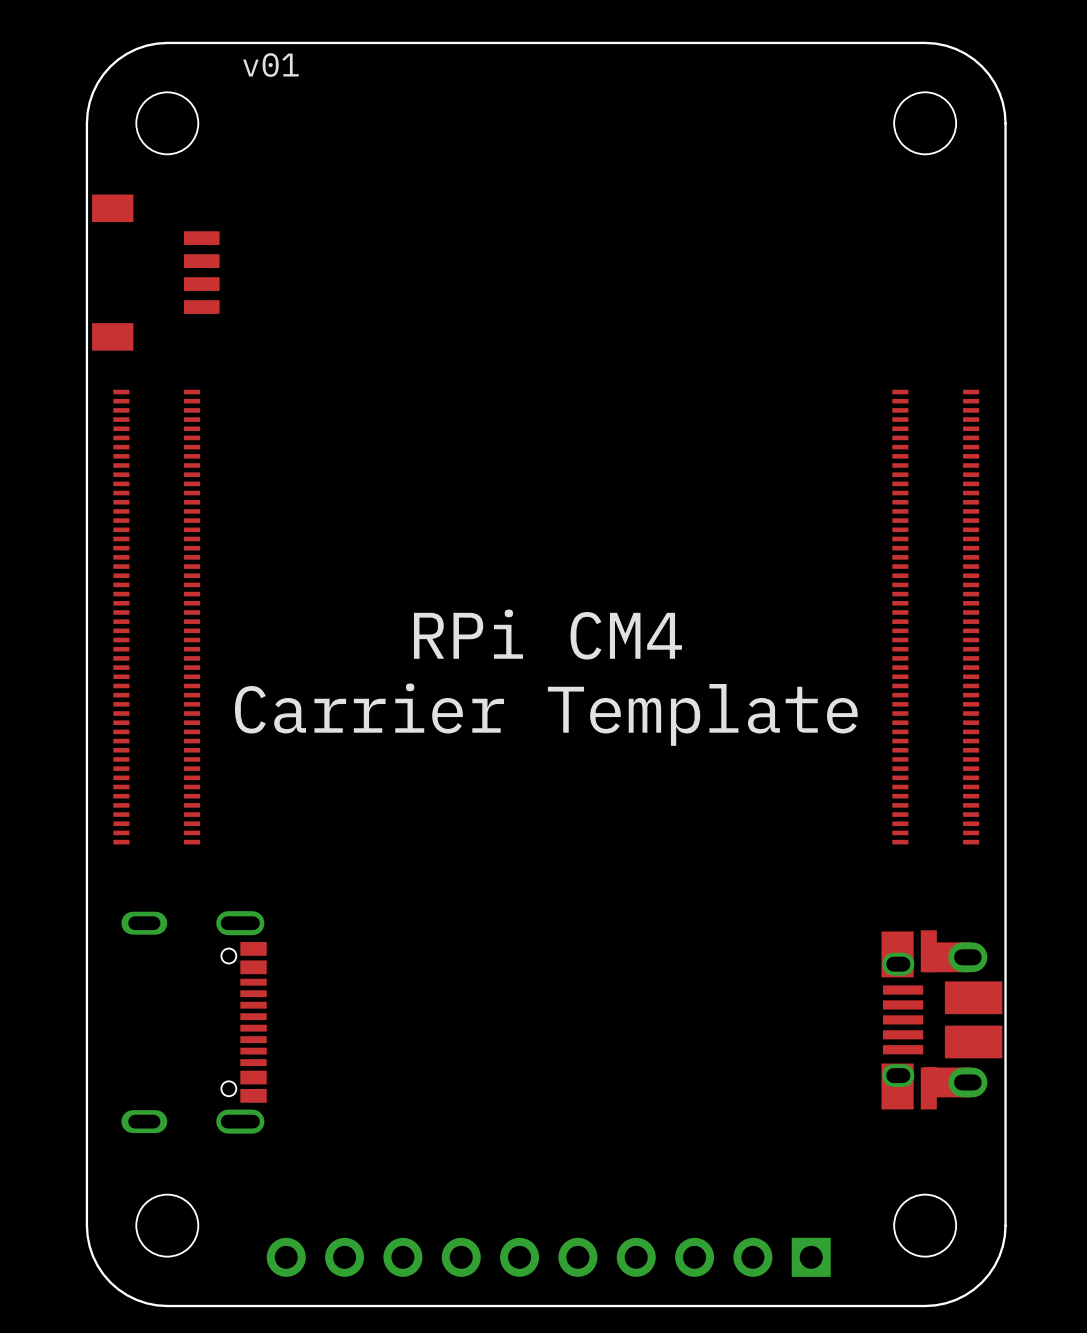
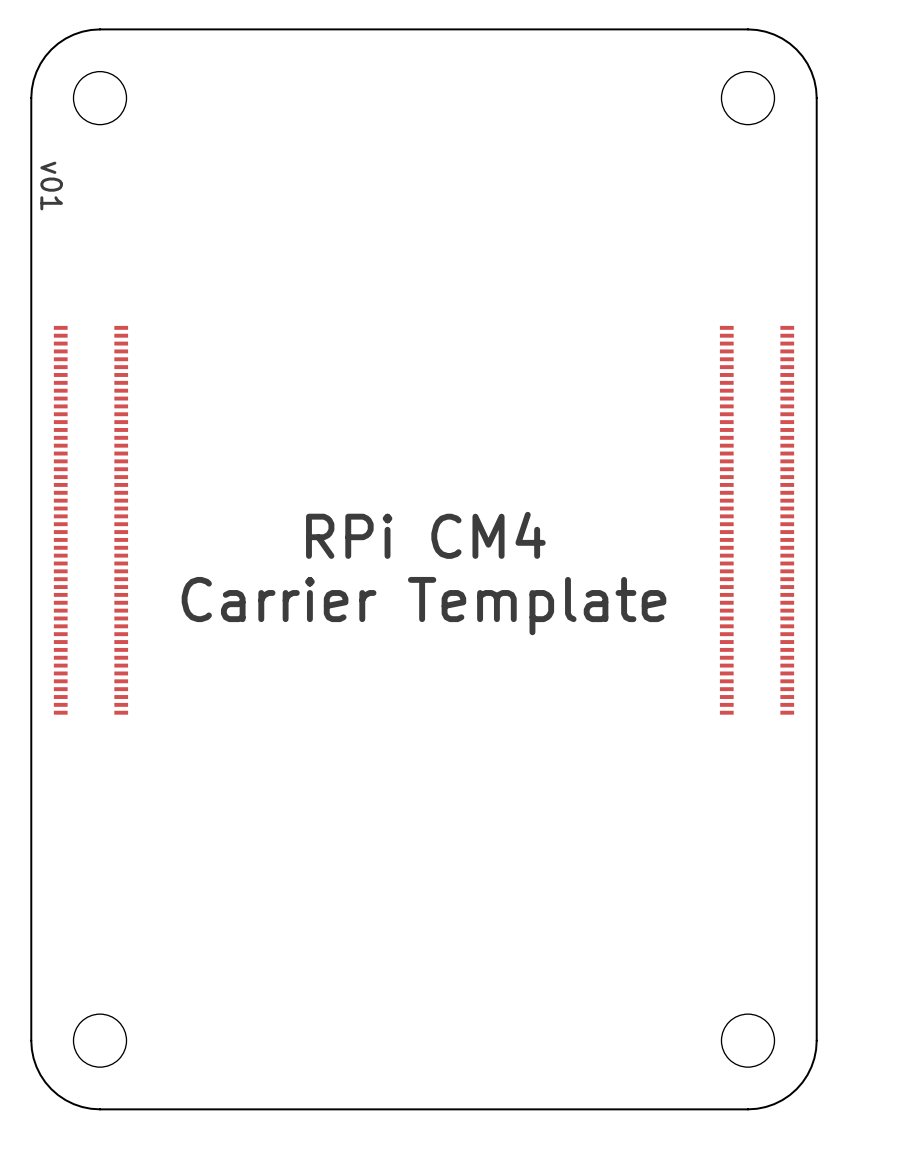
text rotation: 0° (270, 65) -> 90° clockwise (51, 186)
text position: v01 (270, 65) -> v01 (51, 186)
part: (155, 272) -> none
part: (941, 1019) -> none
part: (194, 1022) -> none
part: (548, 1257) -> none

